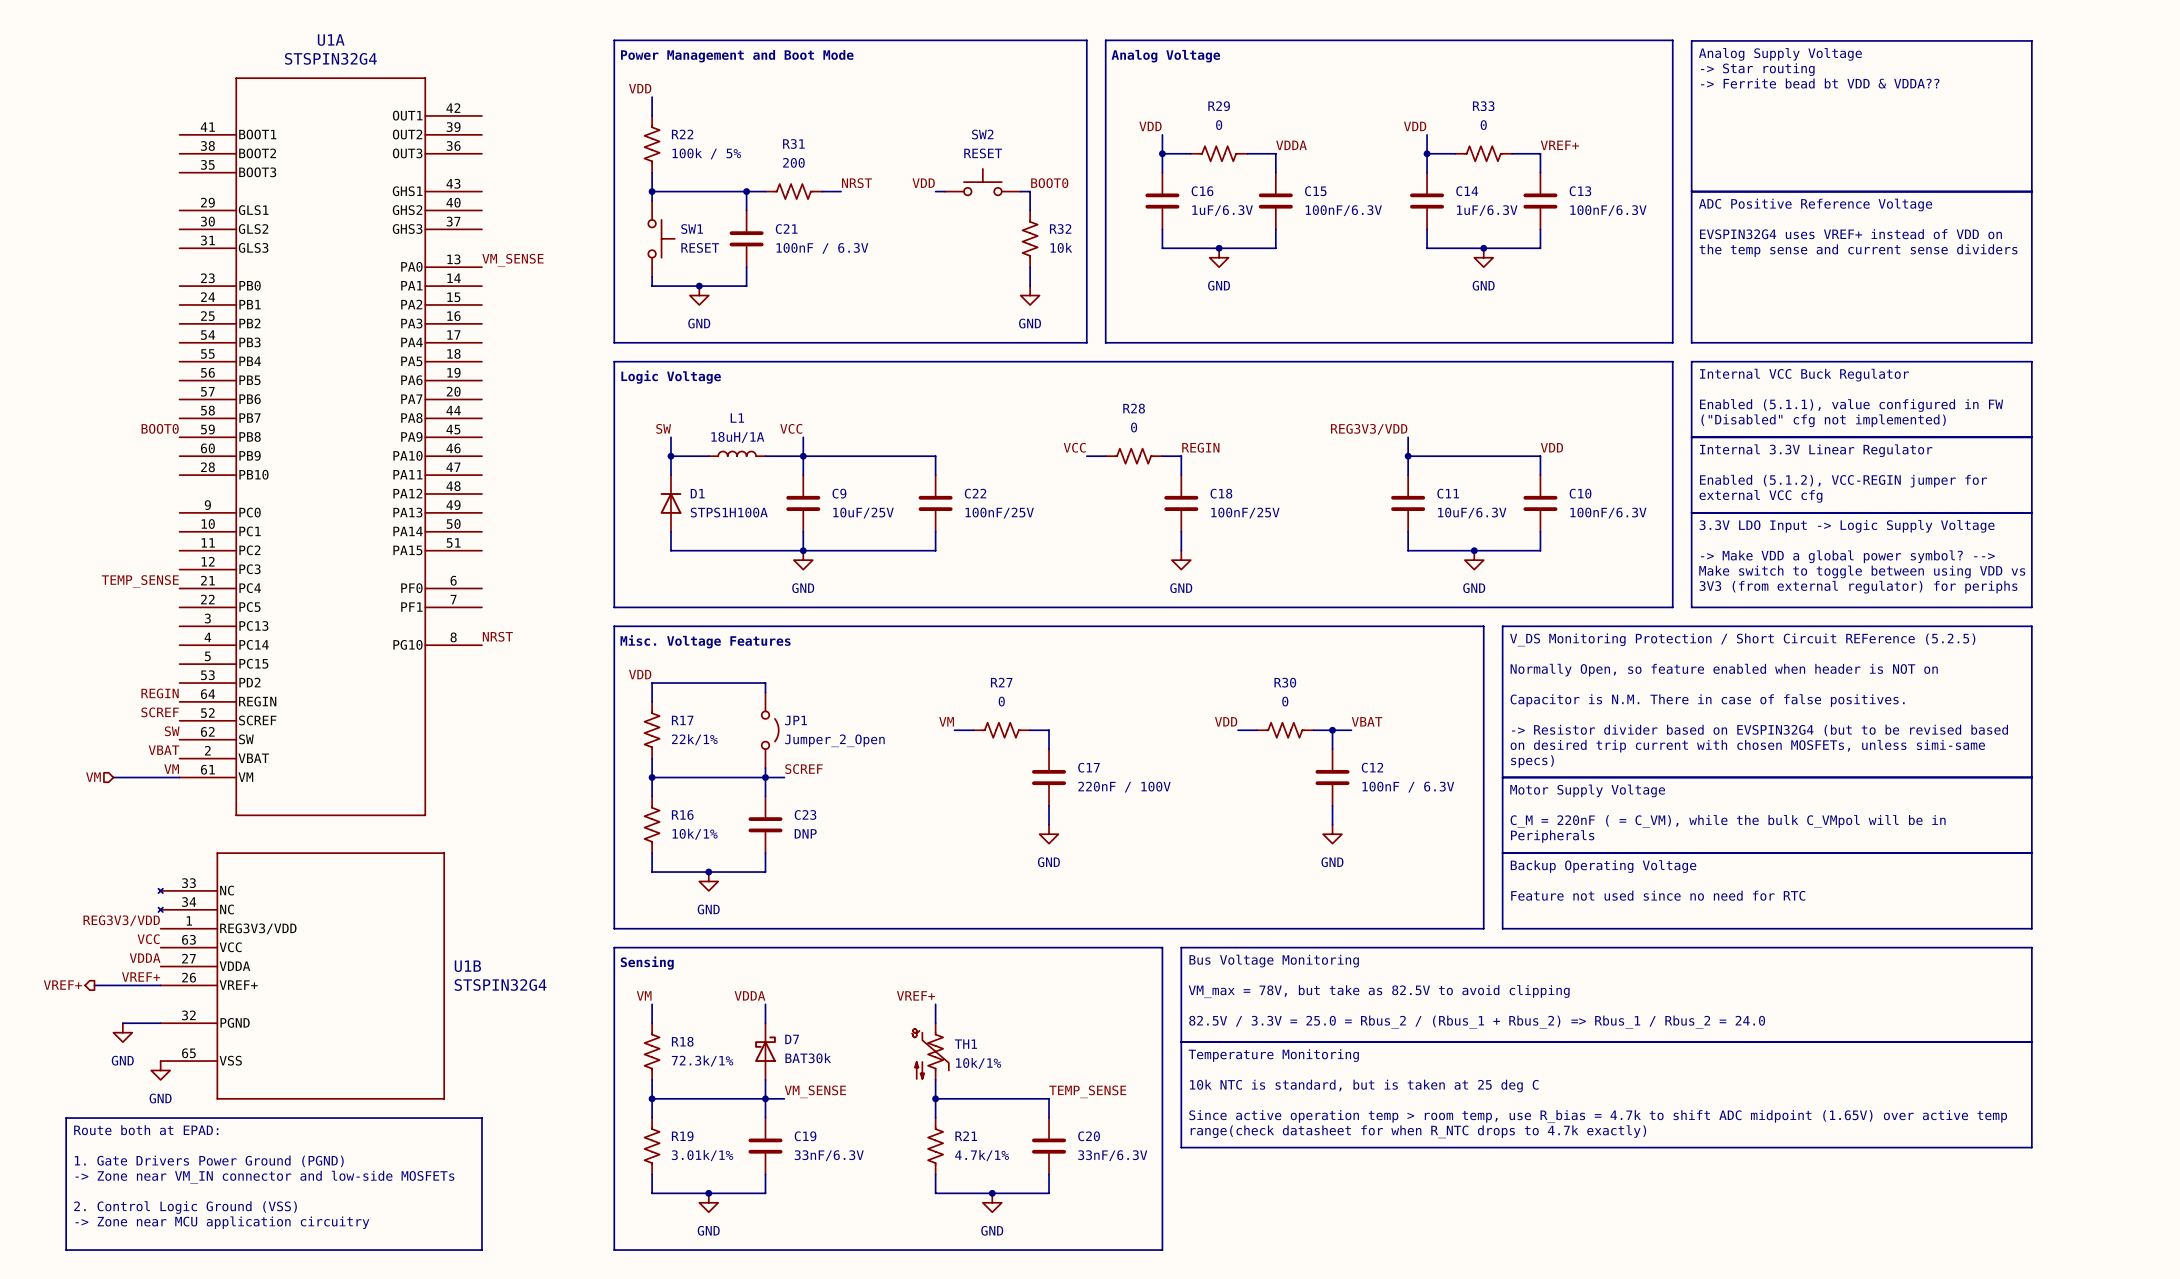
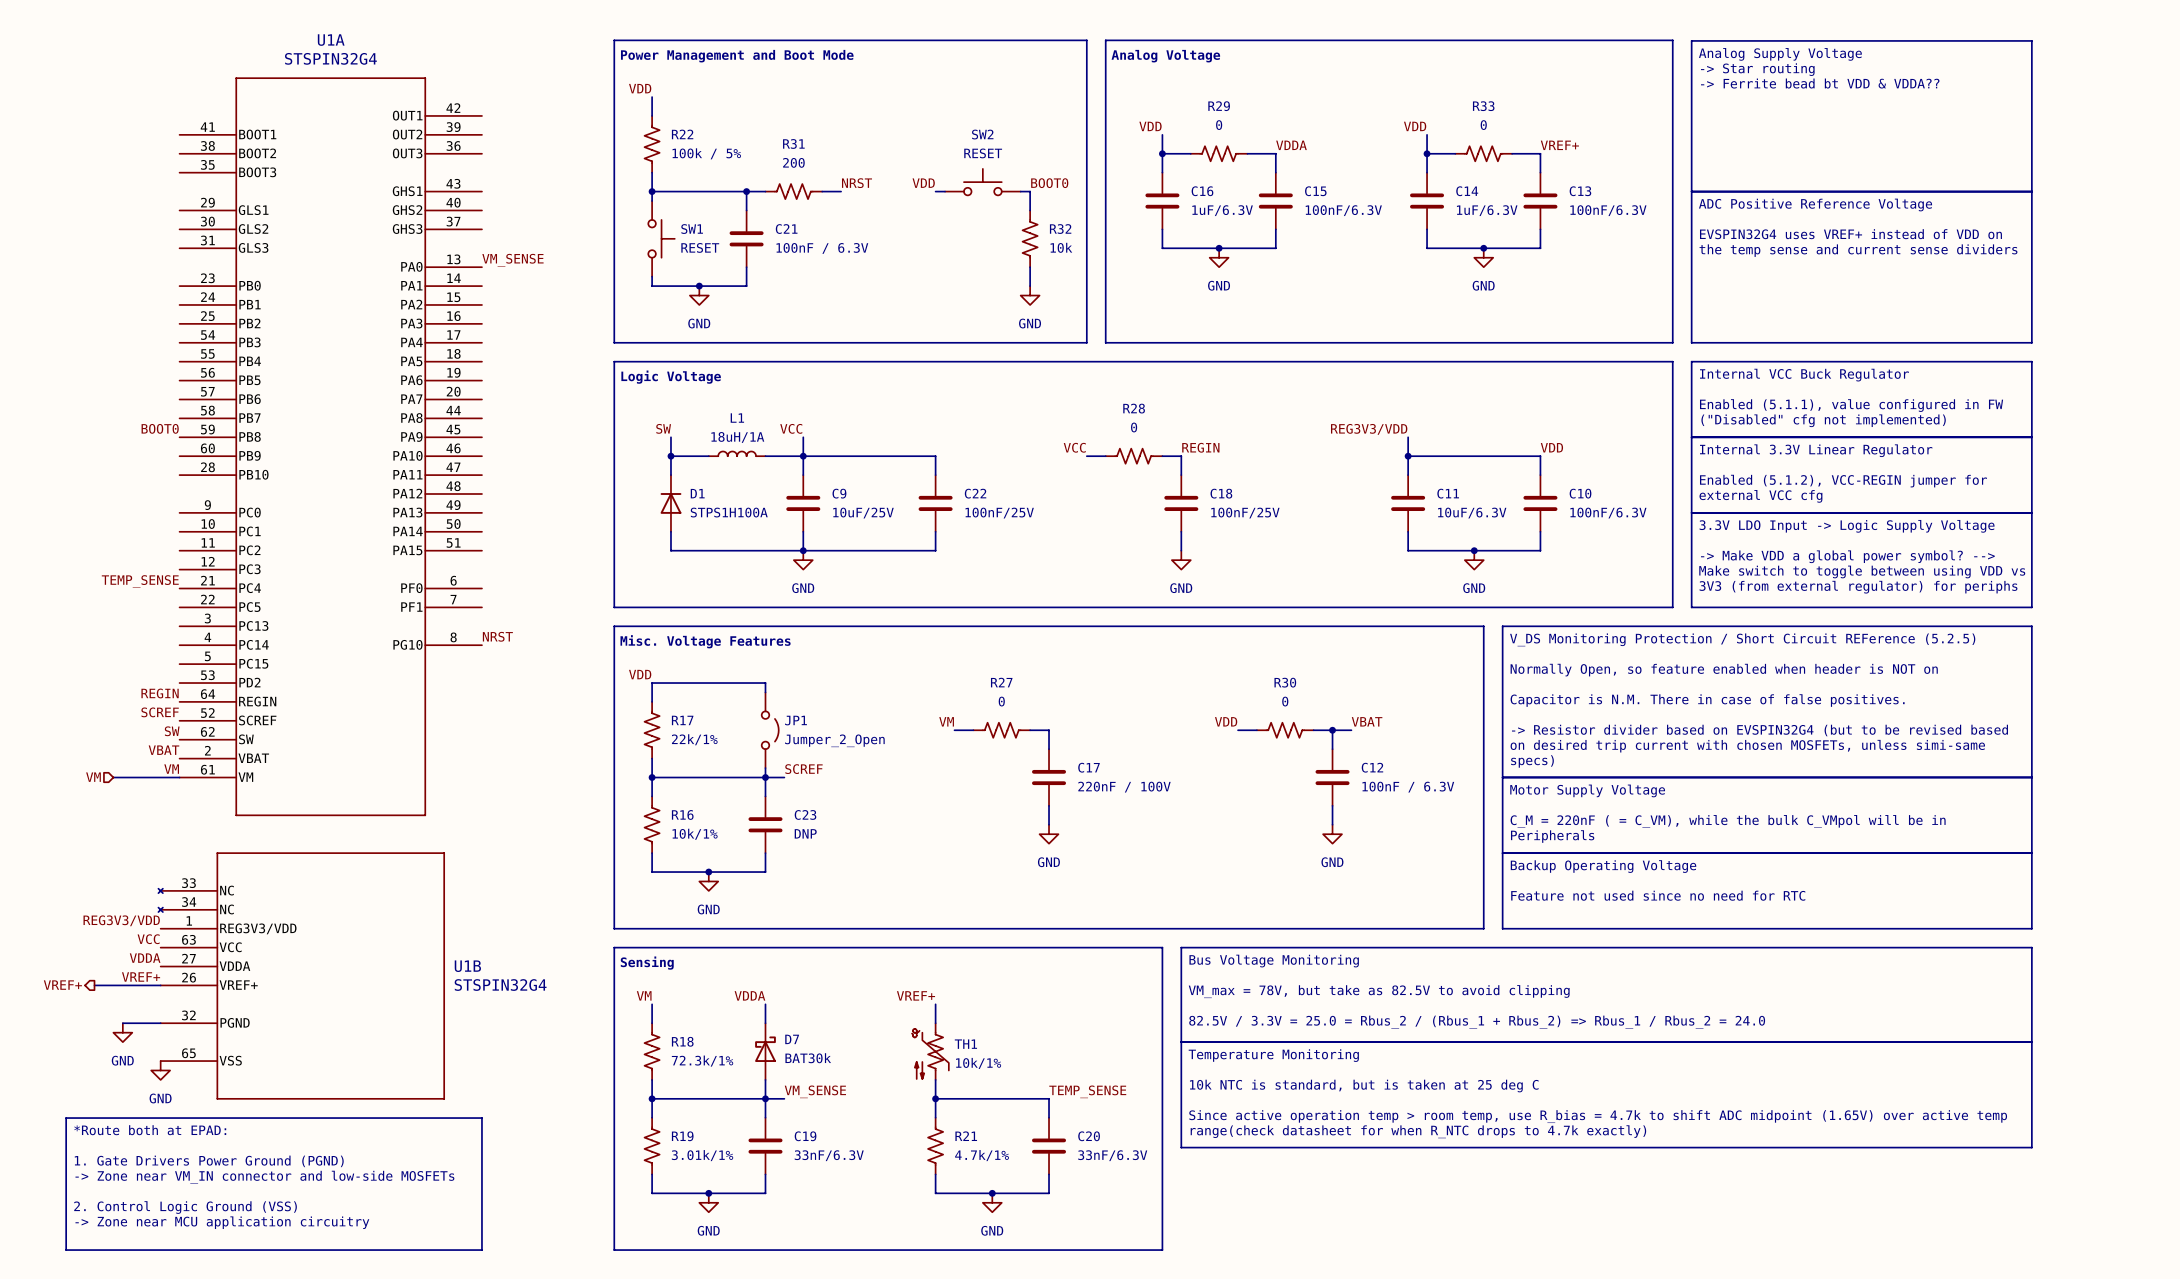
text: Route both at EPAD: (146, 1130) -> *Route both at EPAD: (150, 1130)

